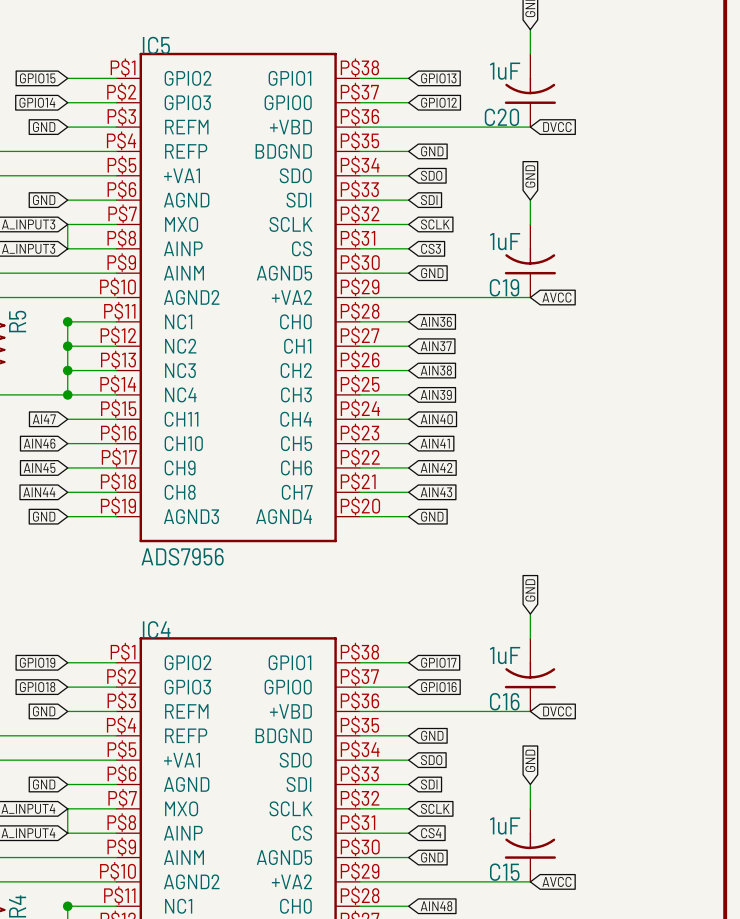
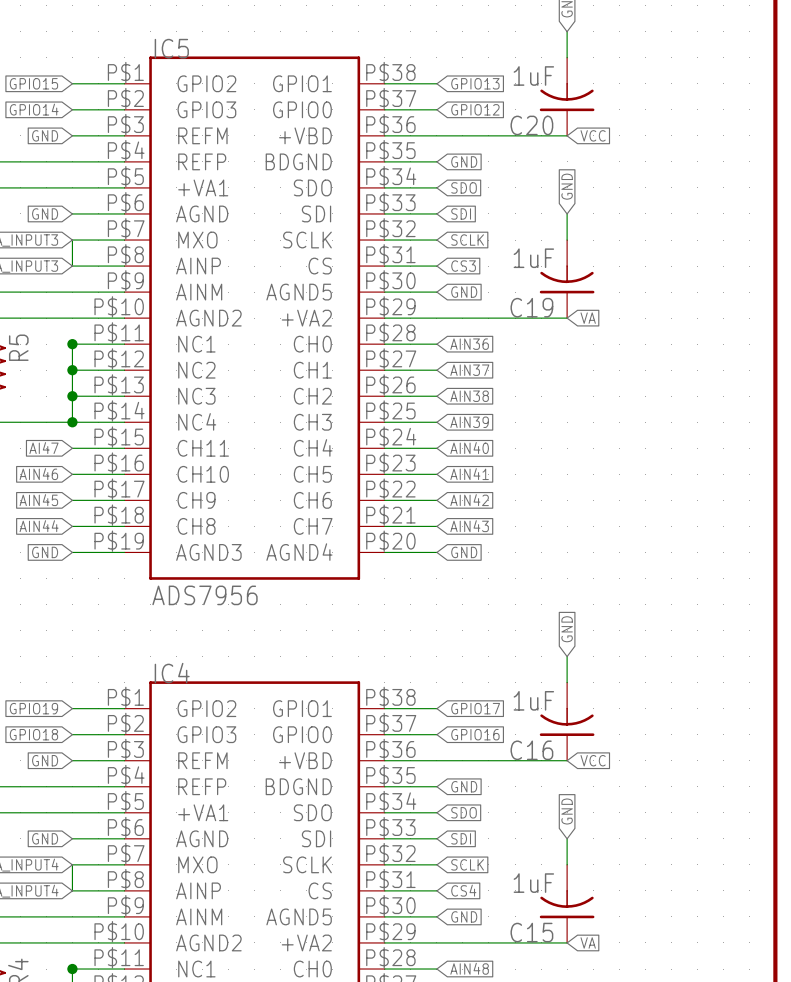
global label: DVCC (557, 127) -> VCC (593, 135)
global label: AVCC (556, 297) -> VA (588, 318)
global label: DVCC (557, 711) -> VCC (593, 760)
global label: AVCC (556, 881) -> VA (588, 942)

